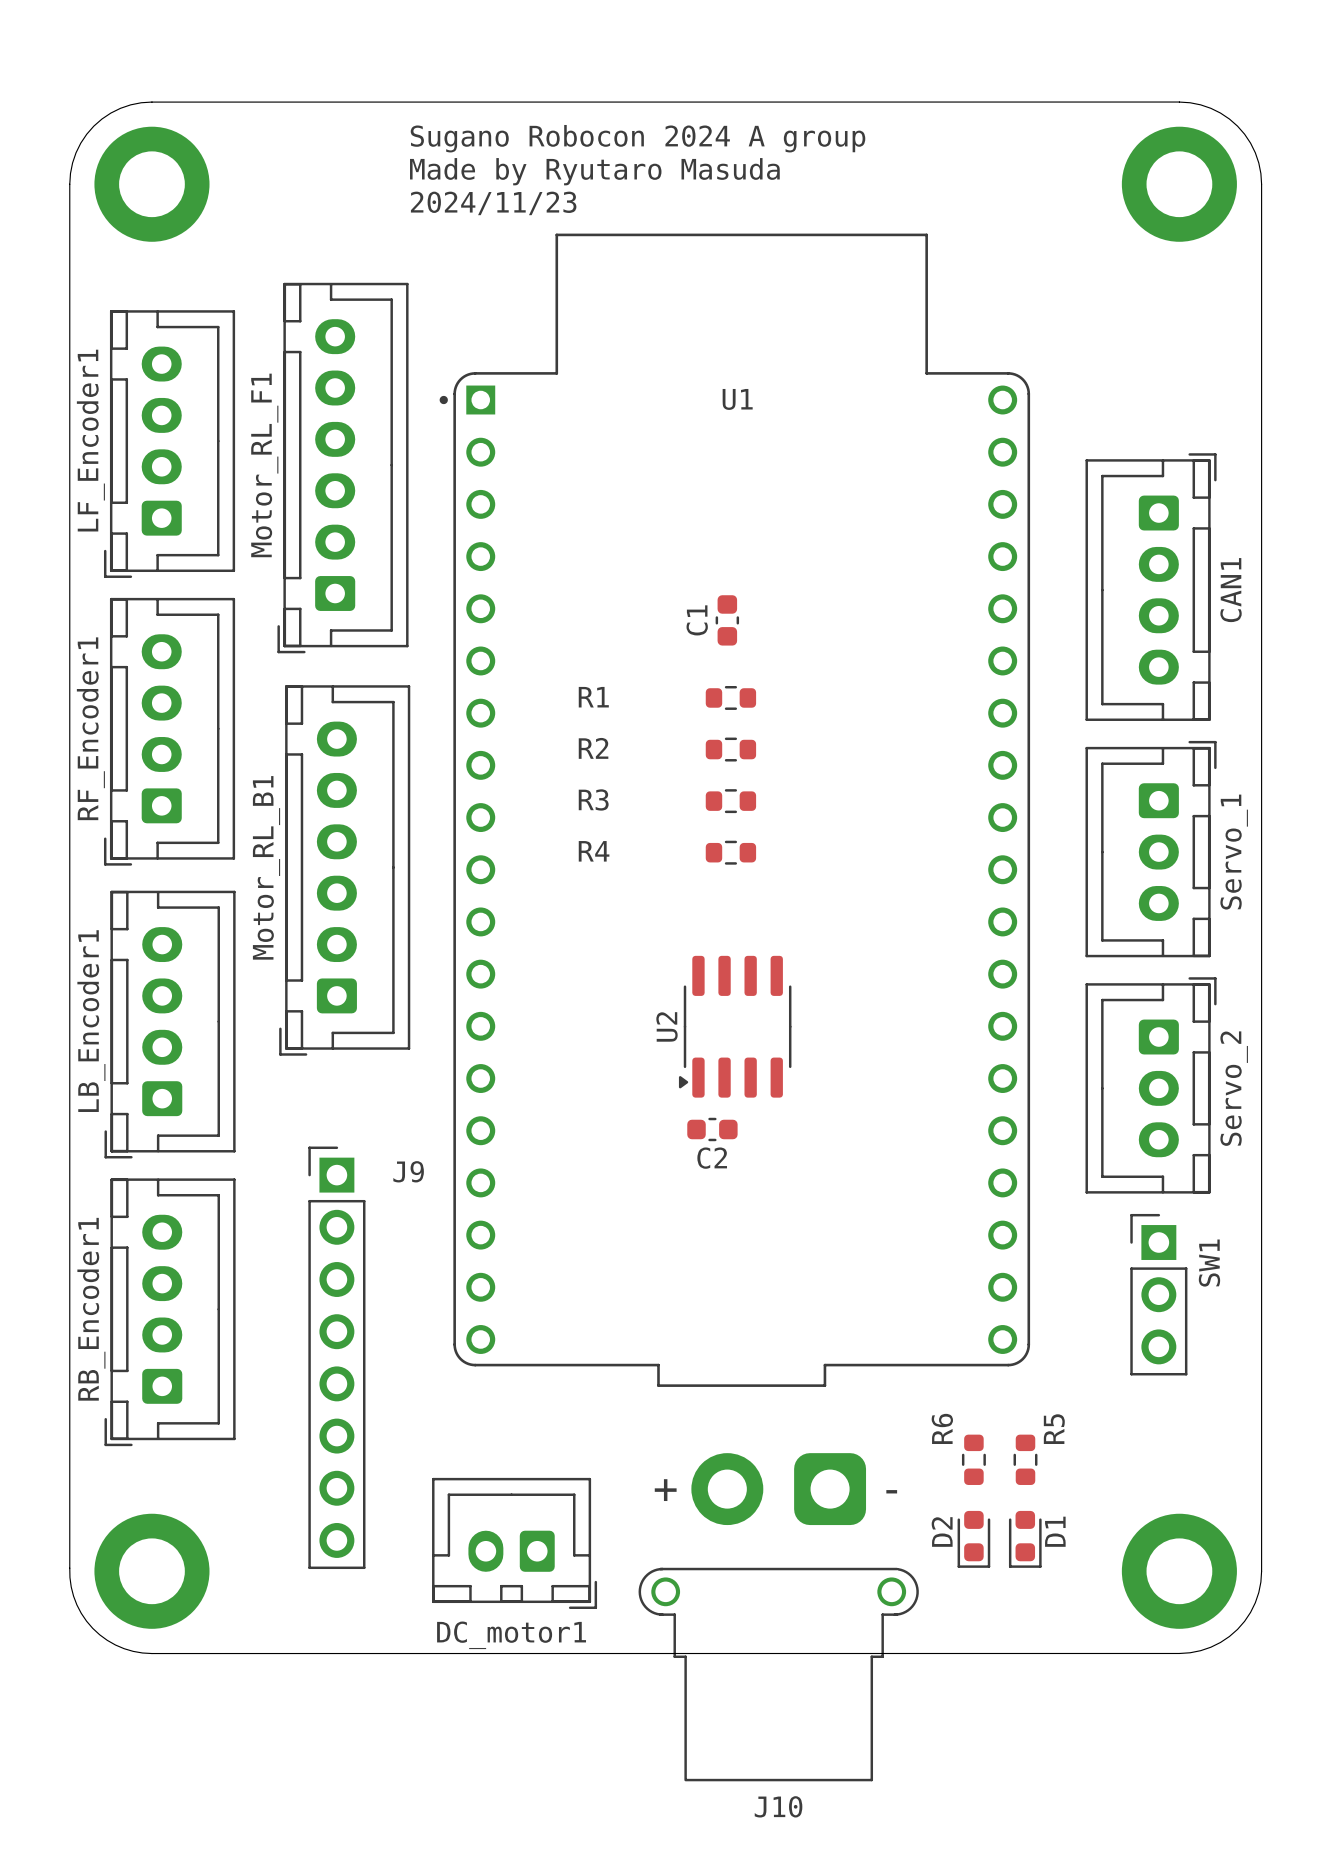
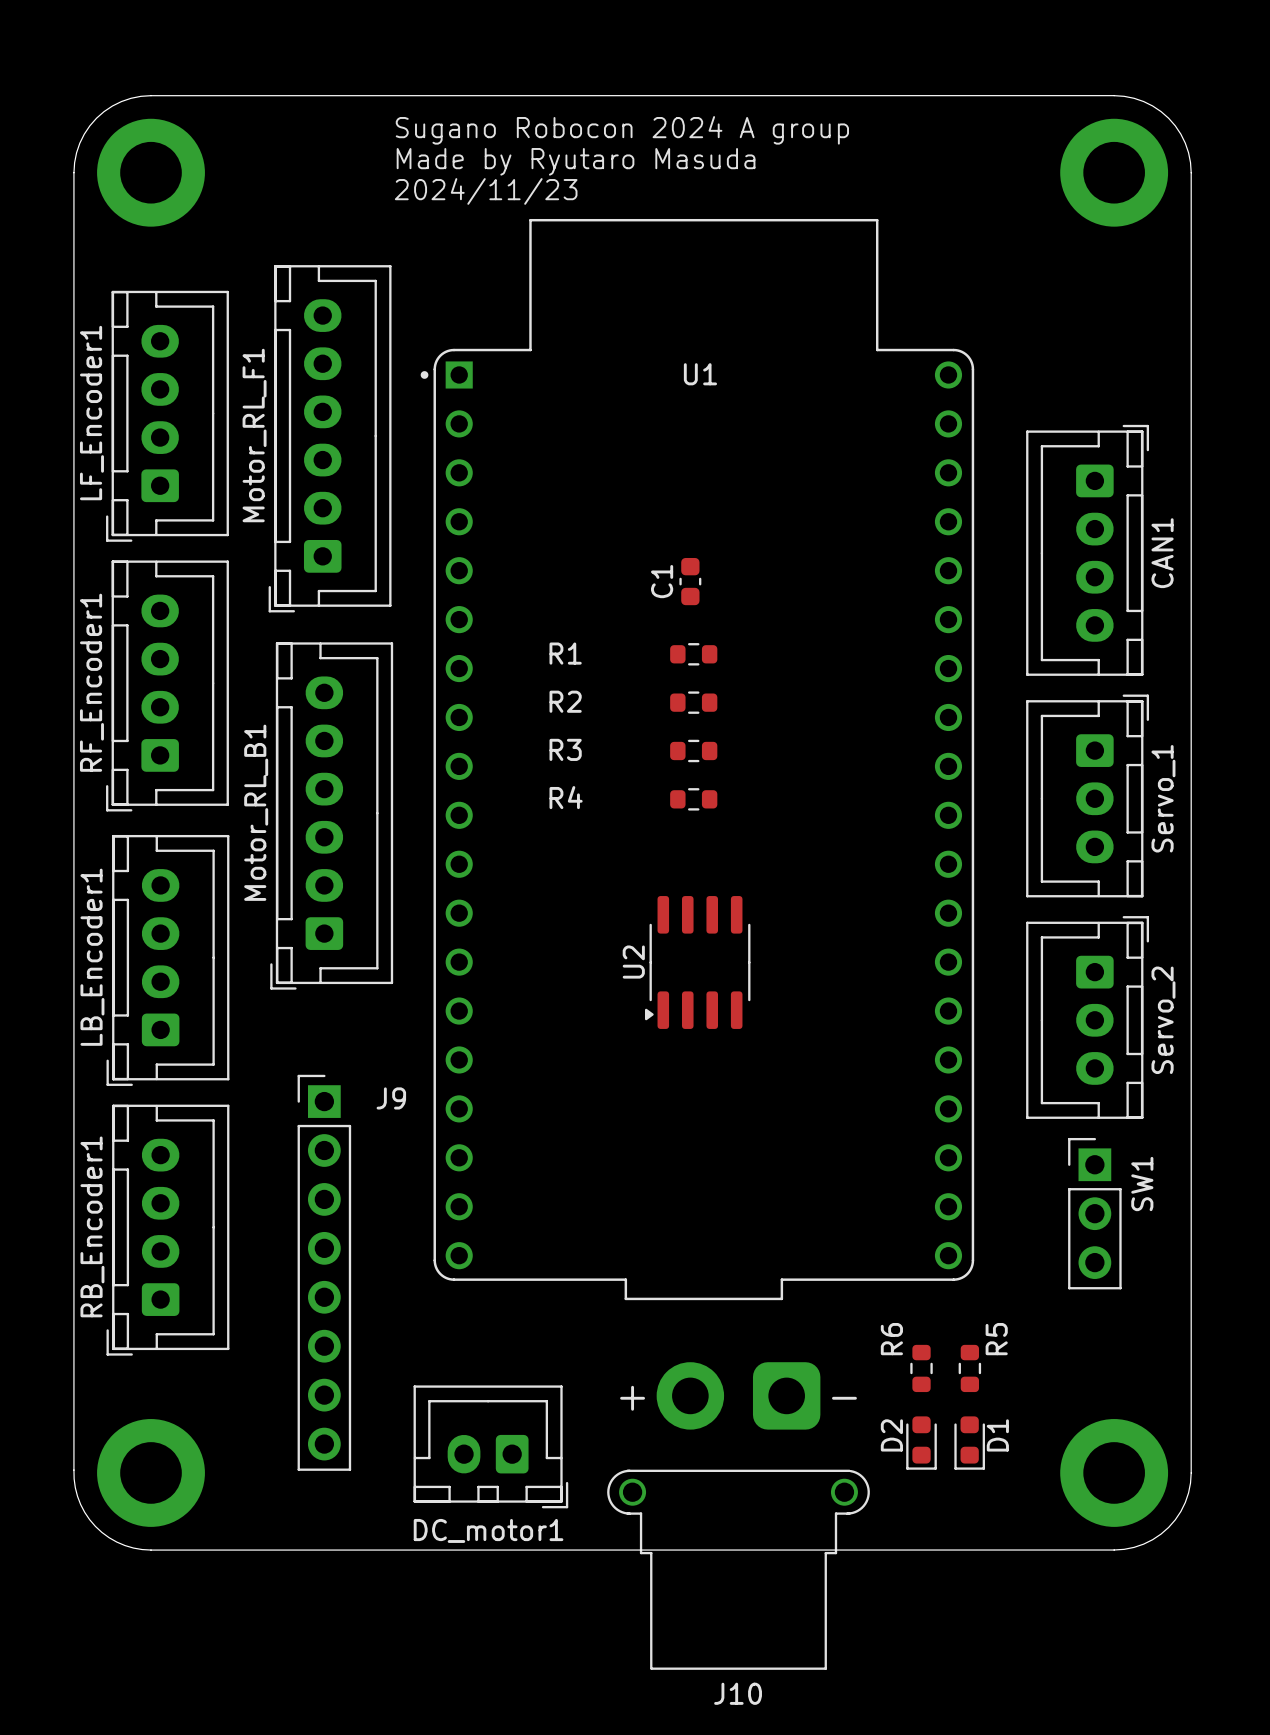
C2: (712, 1129) -> none

